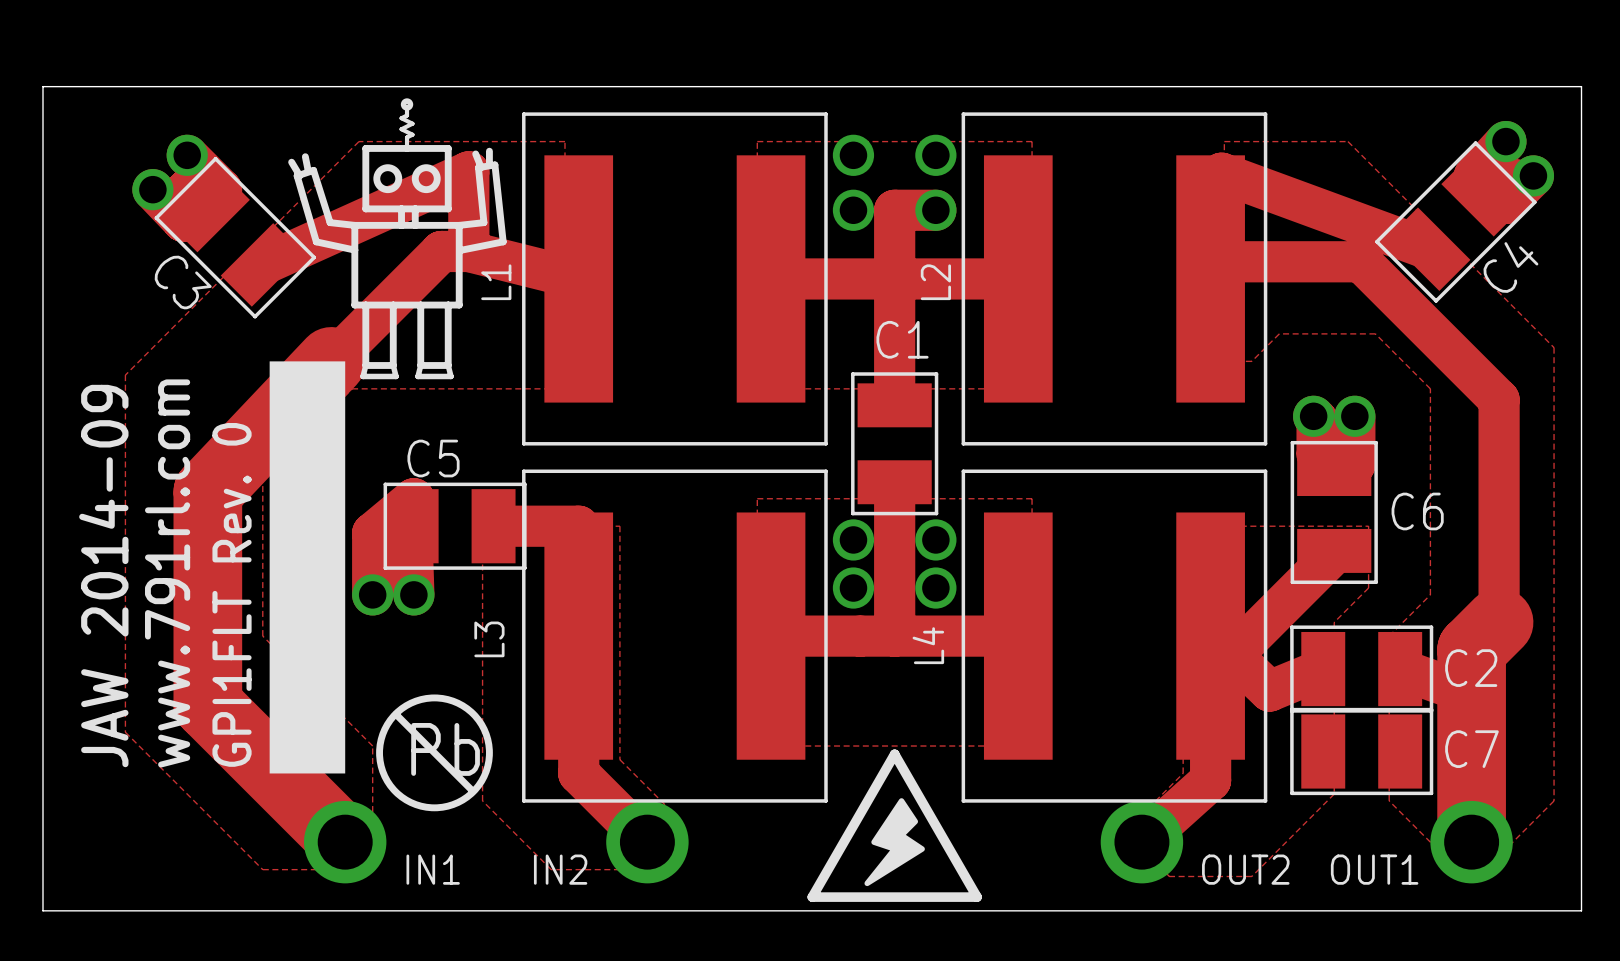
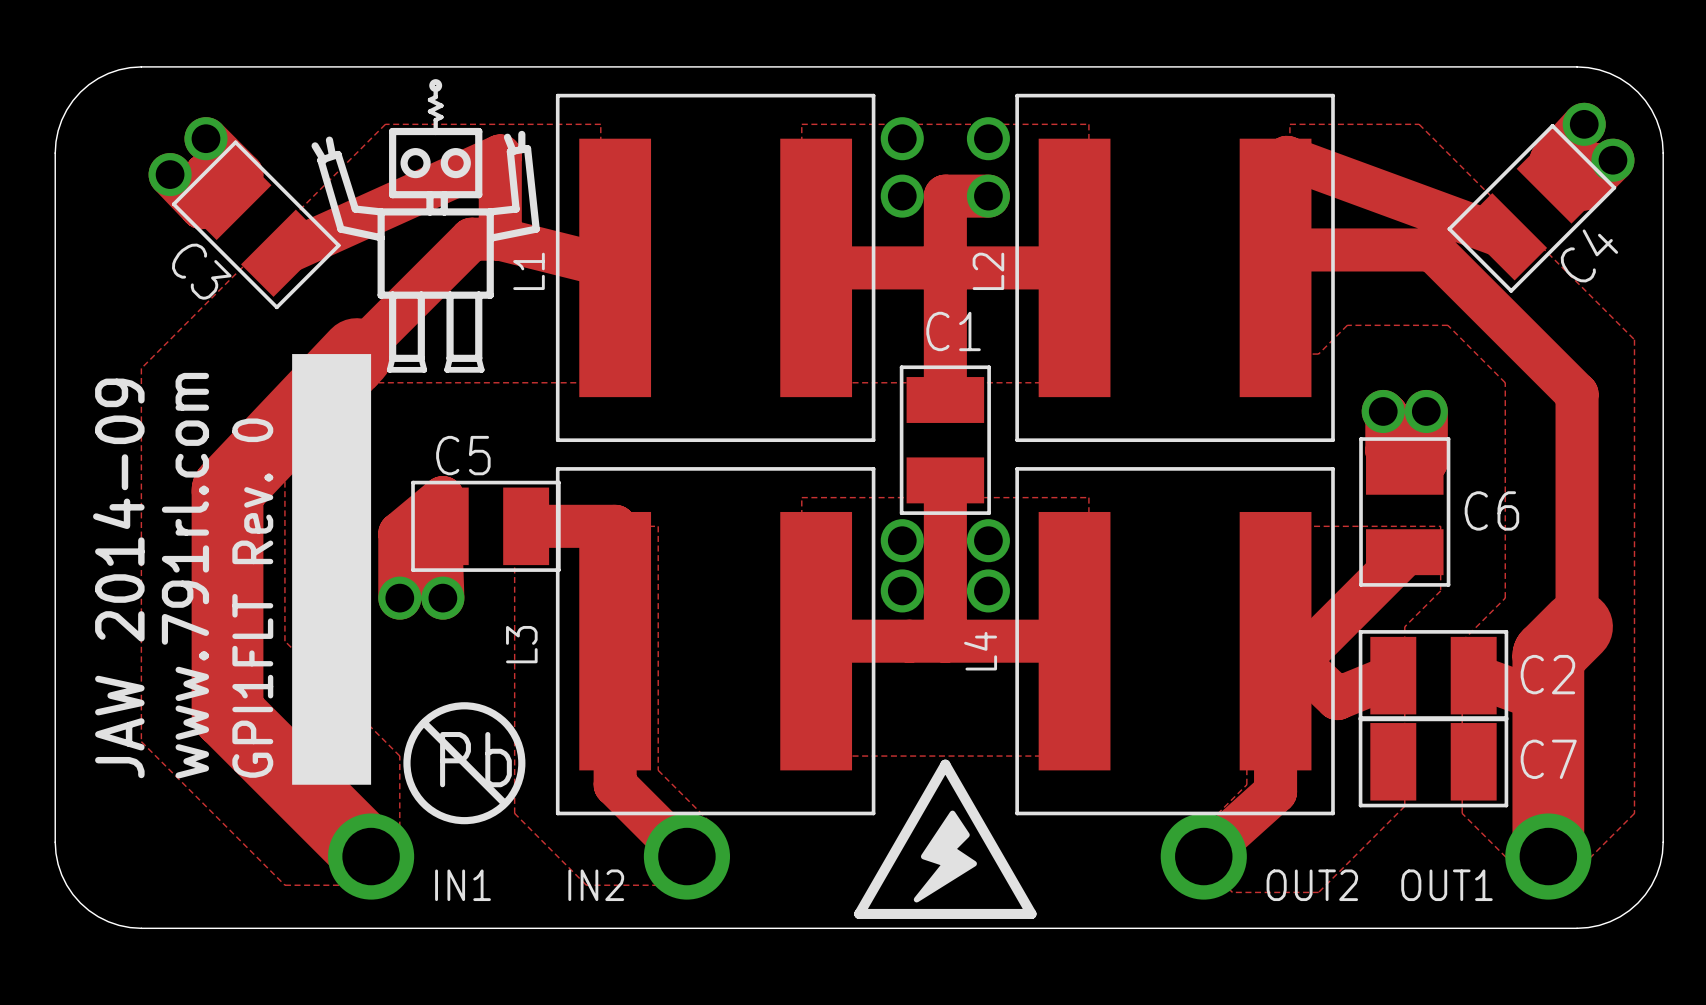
board edge: (125, 86) (42, 86) (42, 169) -> (141, 66) (108, 73) (80, 92) (61, 120) (55, 153)
board edge: (1499, 86) (1581, 86) (1581, 169) -> (1577, 66) (1610, 73) (1637, 92) (1656, 120) (1663, 153)
board edge: (42, 828) (42, 910) (125, 910) -> (55, 842) (61, 875) (80, 903) (108, 921) (141, 928)
board edge: (1581, 828) (1581, 910) (1499, 910) -> (1663, 842) (1656, 875) (1637, 903) (1610, 921) (1577, 928)

